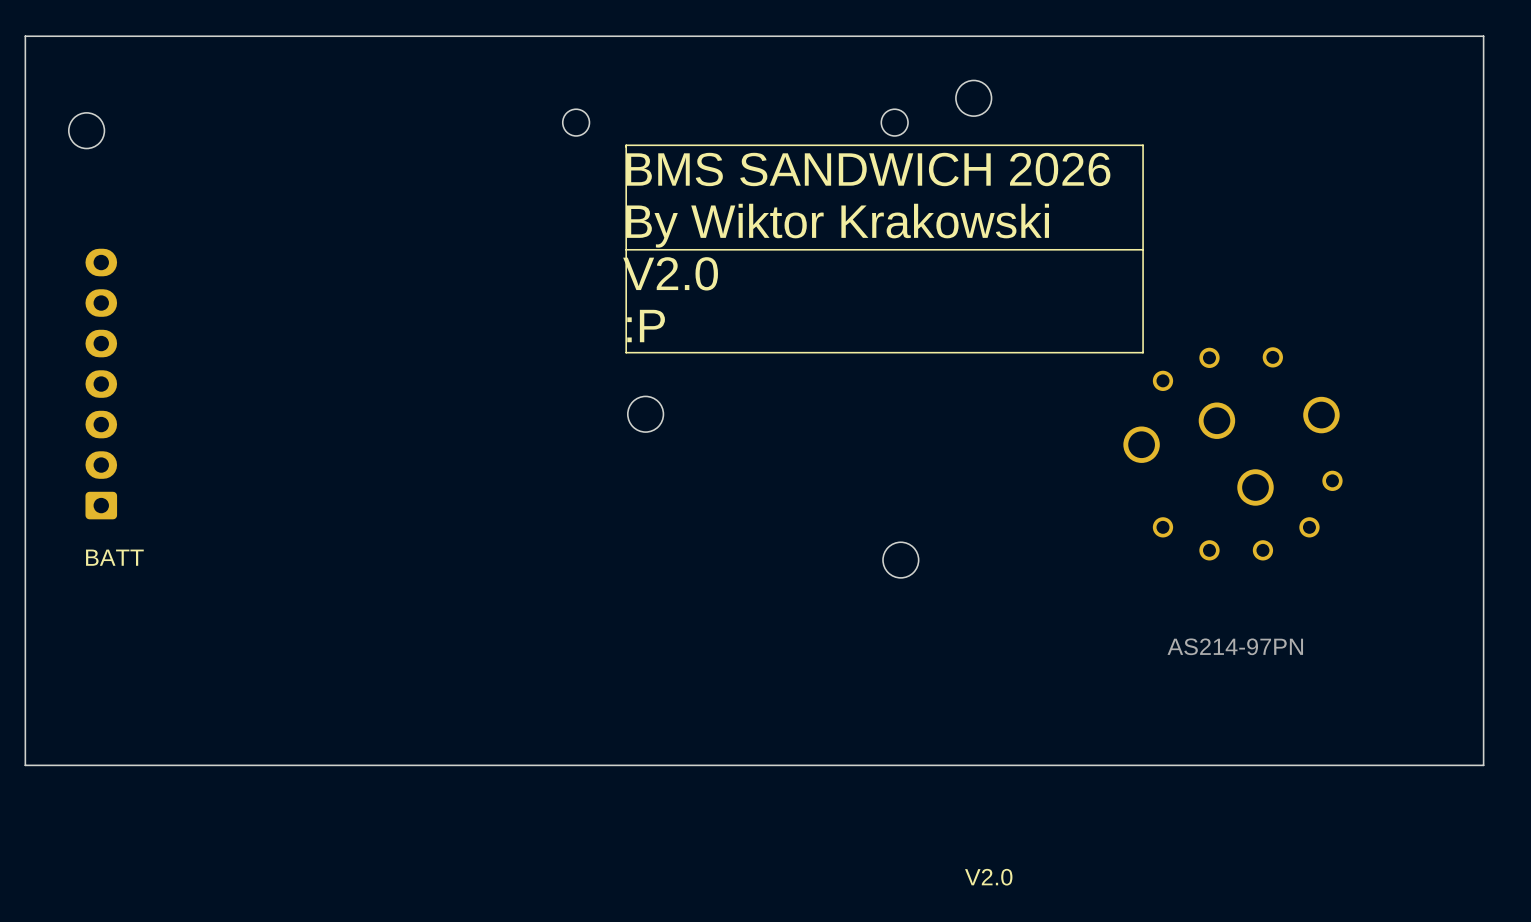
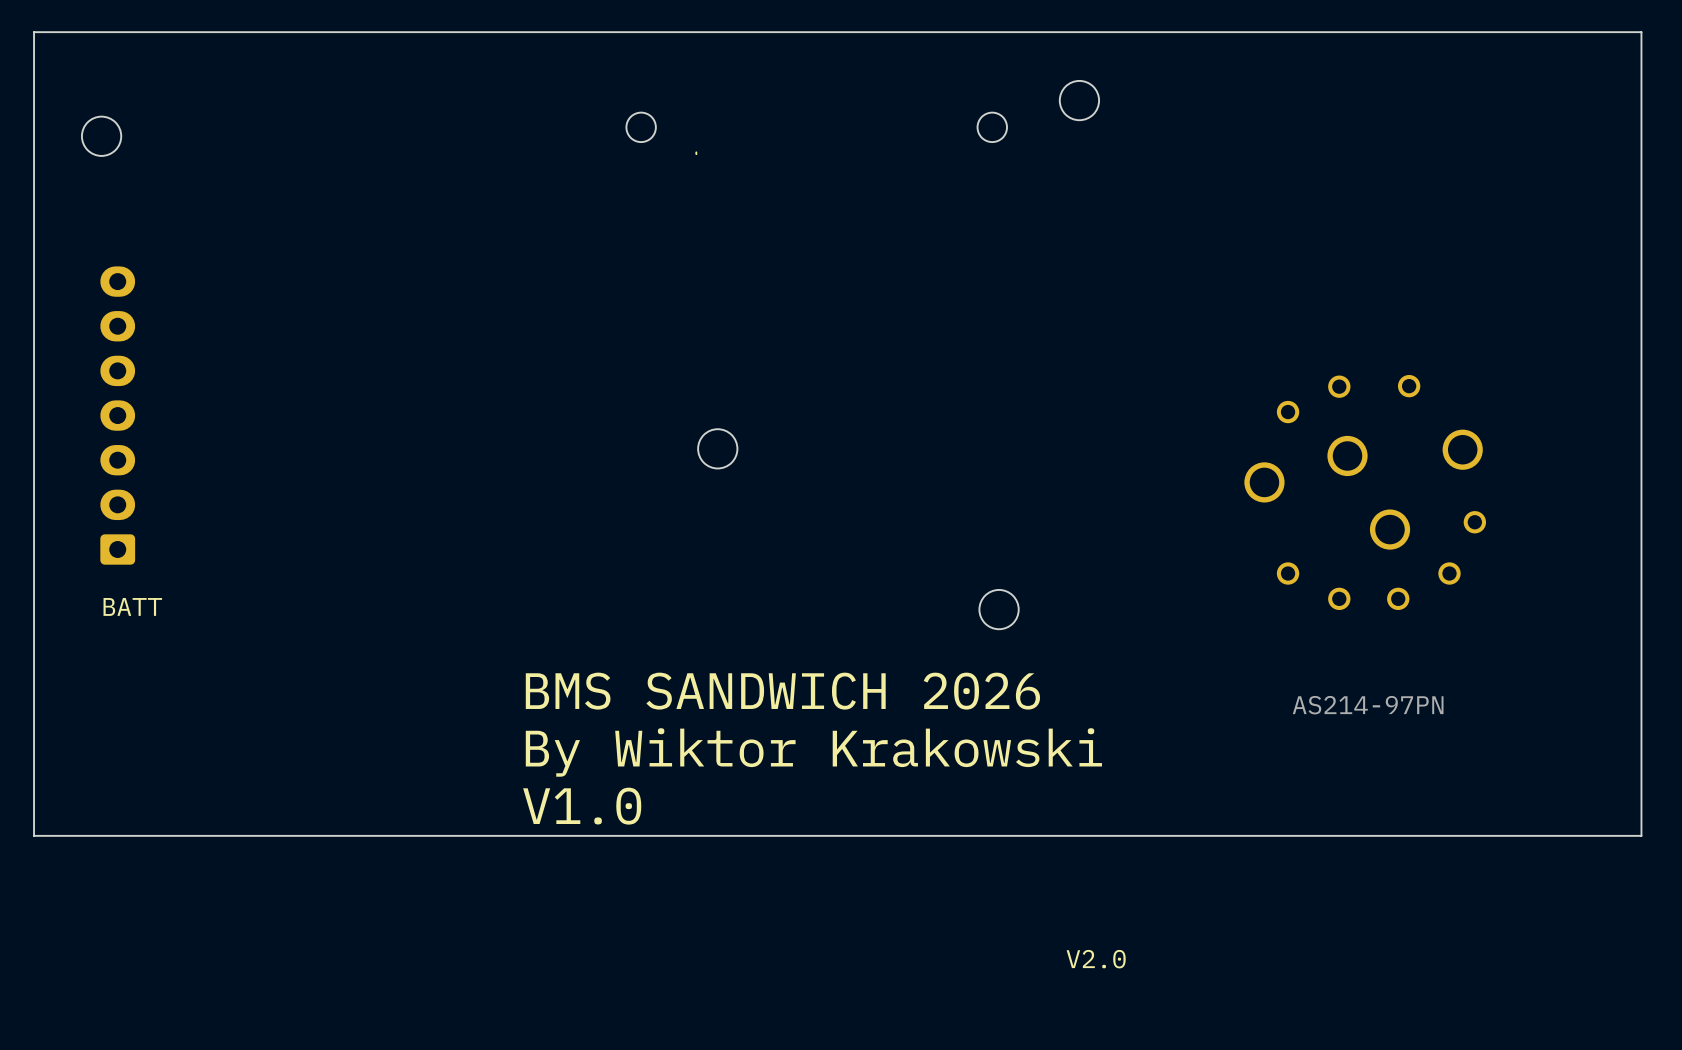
line: (626, 145) (1143, 145) (1143, 352) (626, 352) (626, 146) -> none
text: BMS SANDWICH 2026 (868, 169) -> none
text: By Wiktor Krakowski (837, 225) -> none
line: (1143, 249) (626, 249) -> none
text: V2.0 (670, 273) -> none
text: :P (646, 326) -> none
text: none -> BMS SANDWICH 2026 (782, 691)
text: none -> By Wiktor Krakowski (813, 752)
text: none -> V1.0 (582, 806)

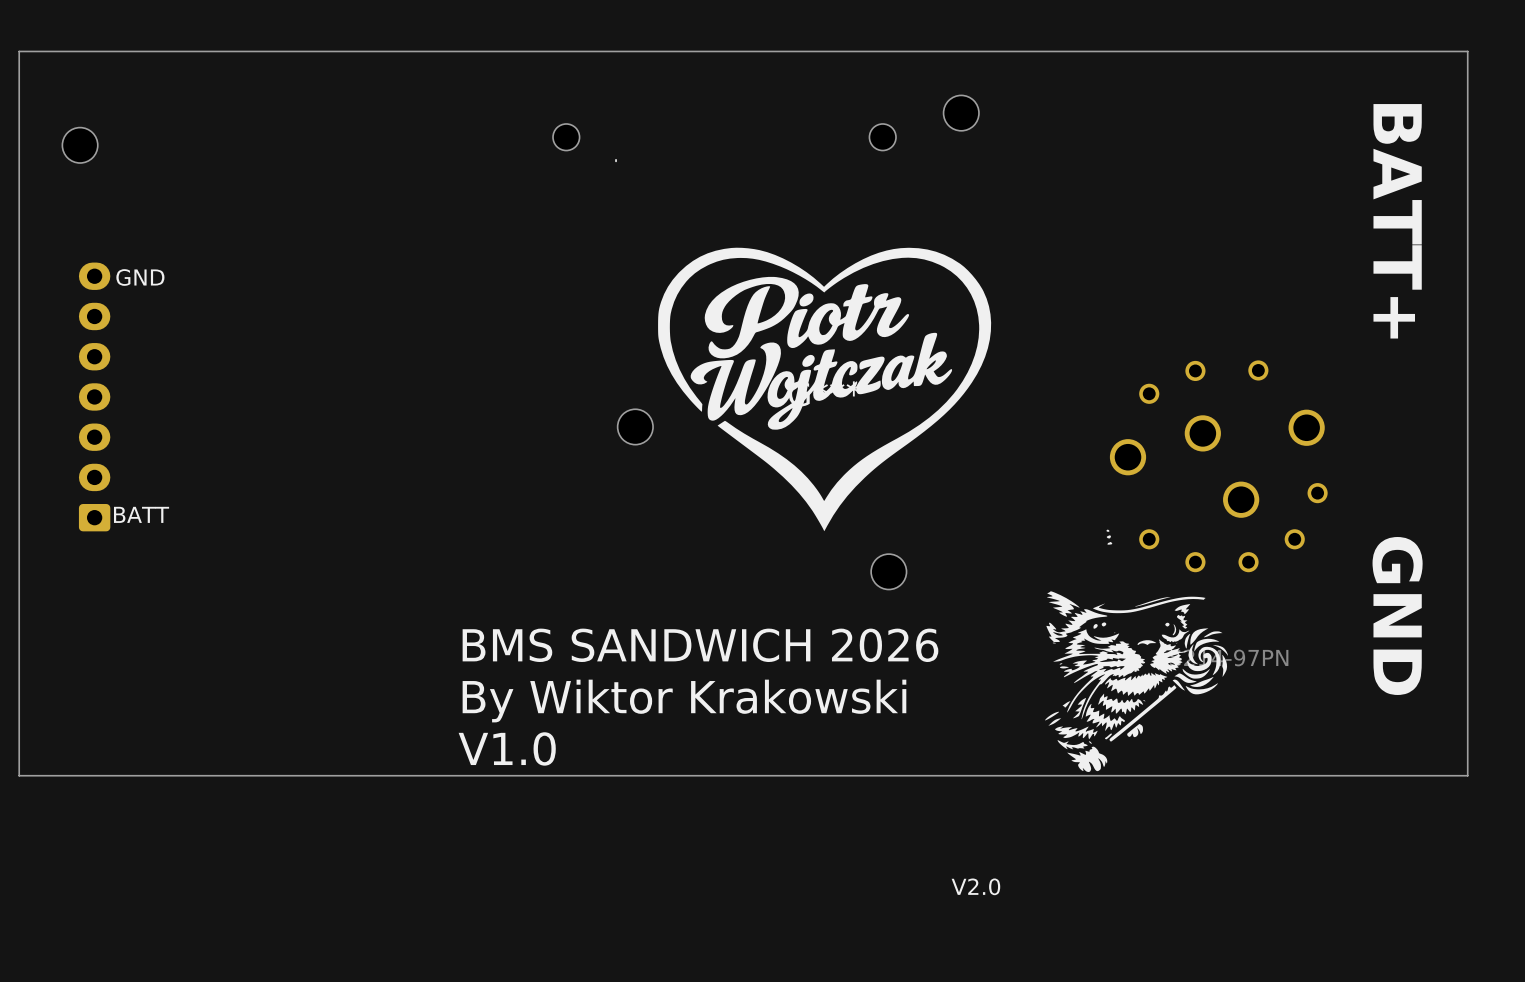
text: none -> BATT+ (1397, 221)
text: none -> GND (140, 277)
part: none -> (824, 389)
drawing: none -> [1044, 529, 1228, 773]
text position: BATT (132, 606) -> BATT (141, 514)
text: none -> GND (1397, 615)

